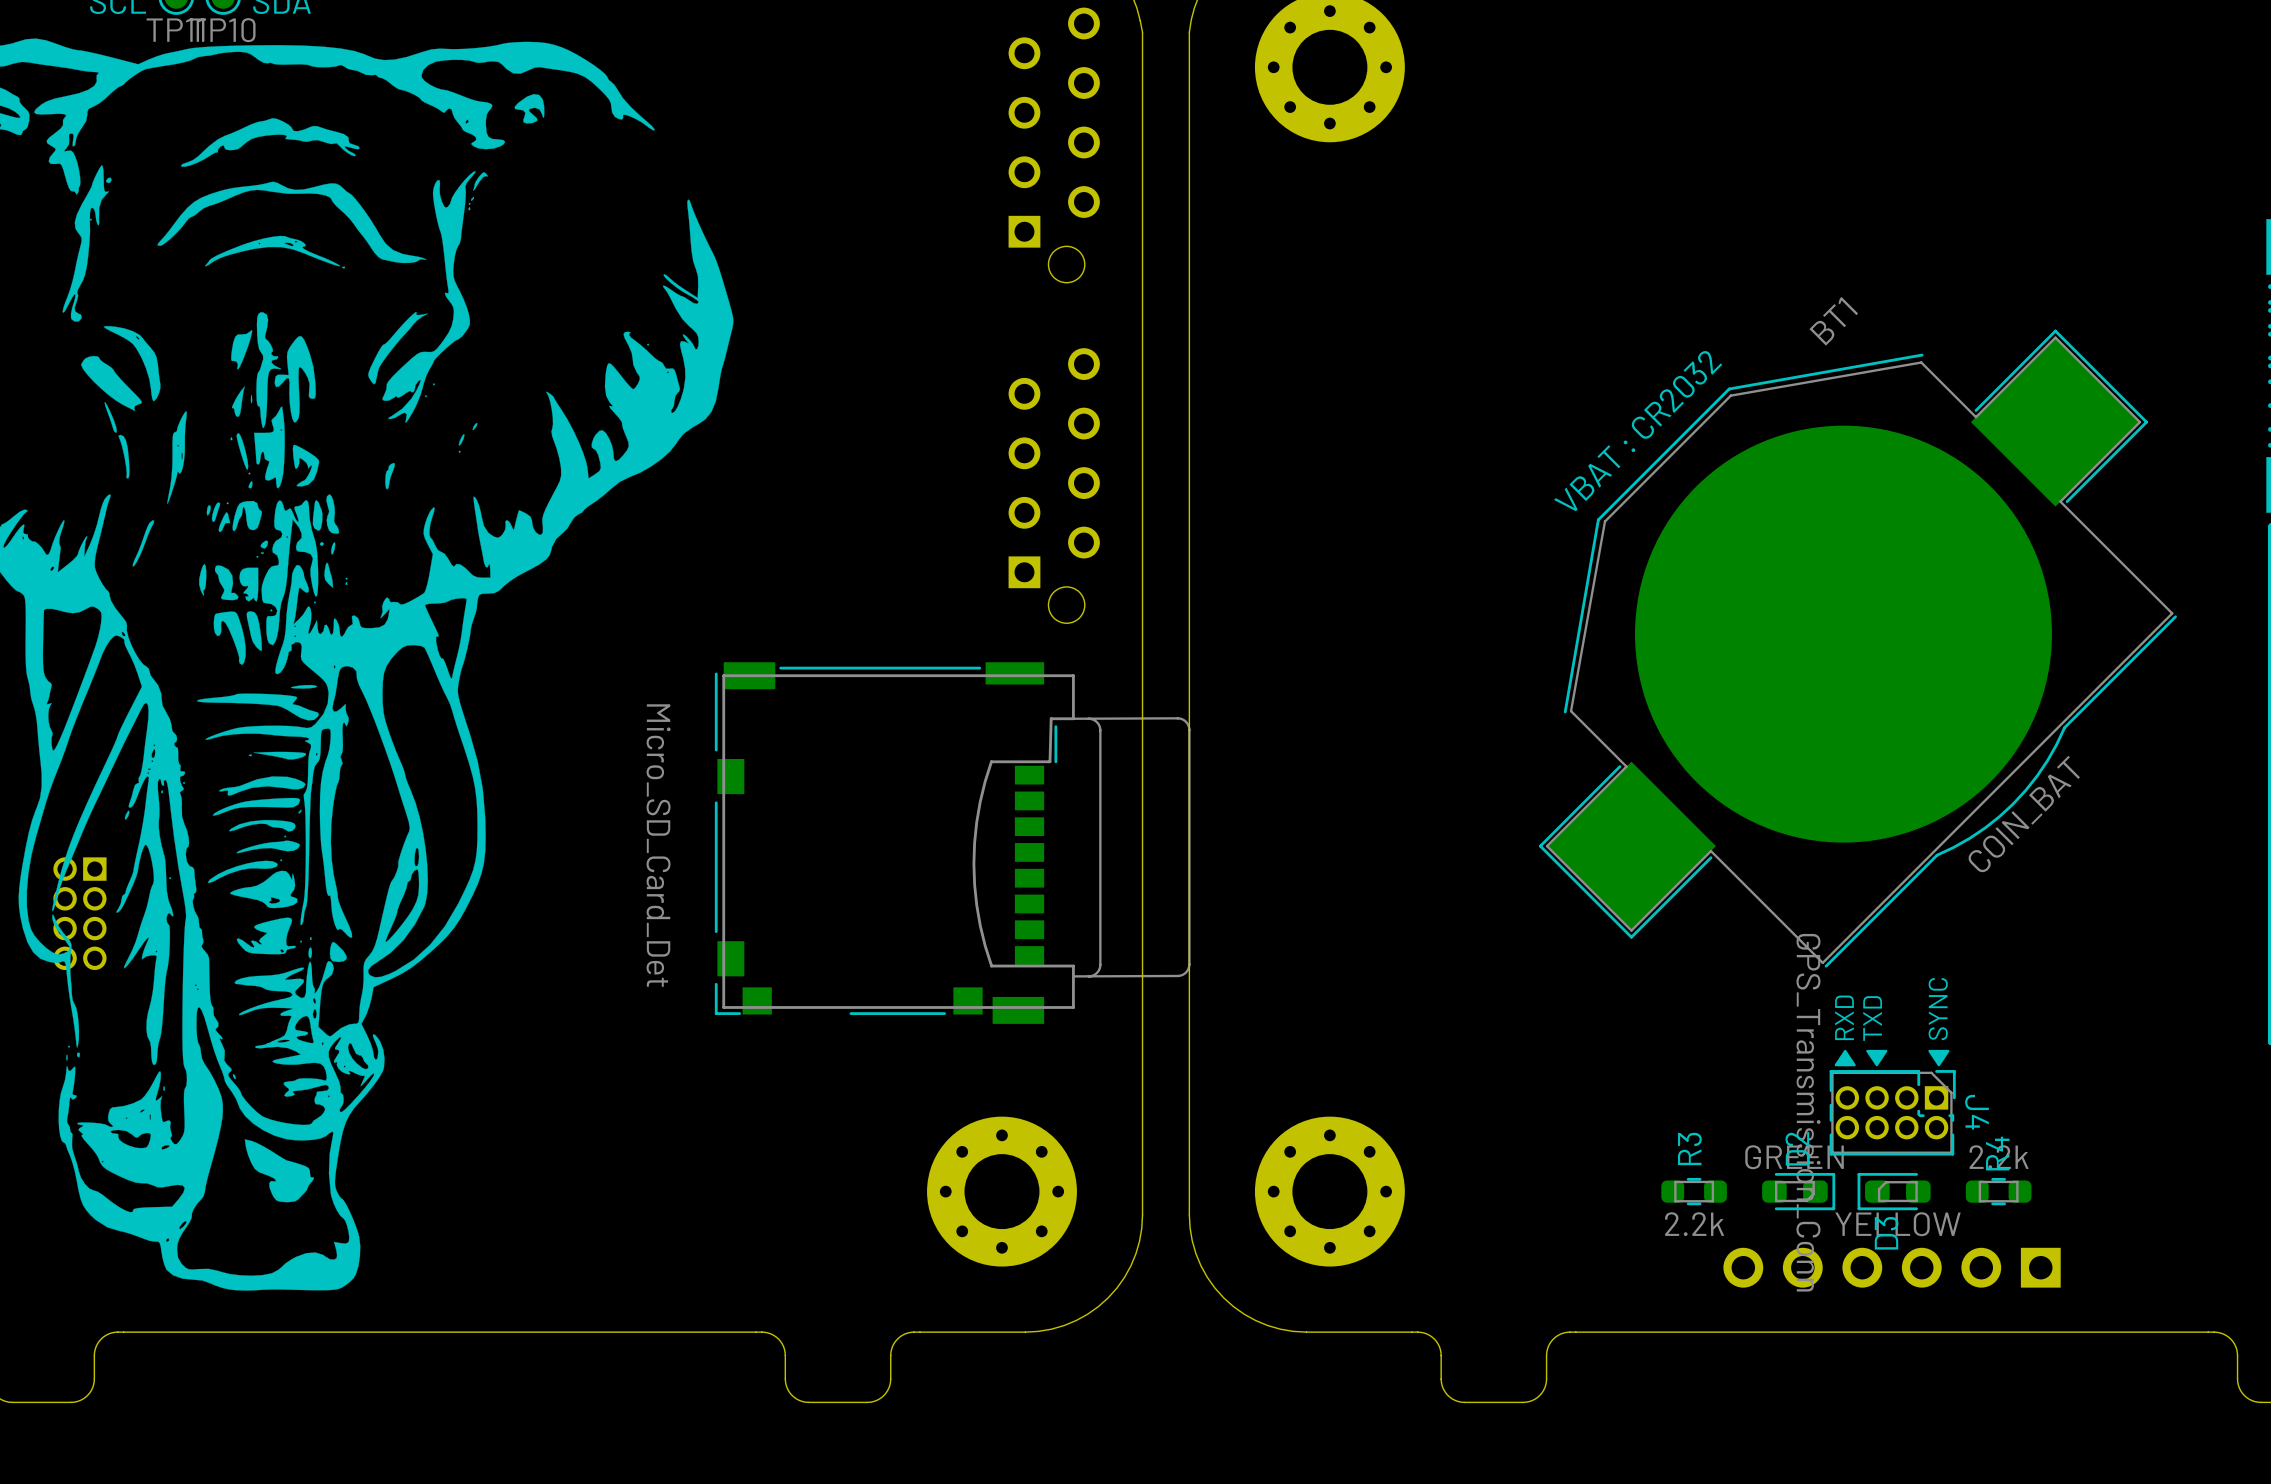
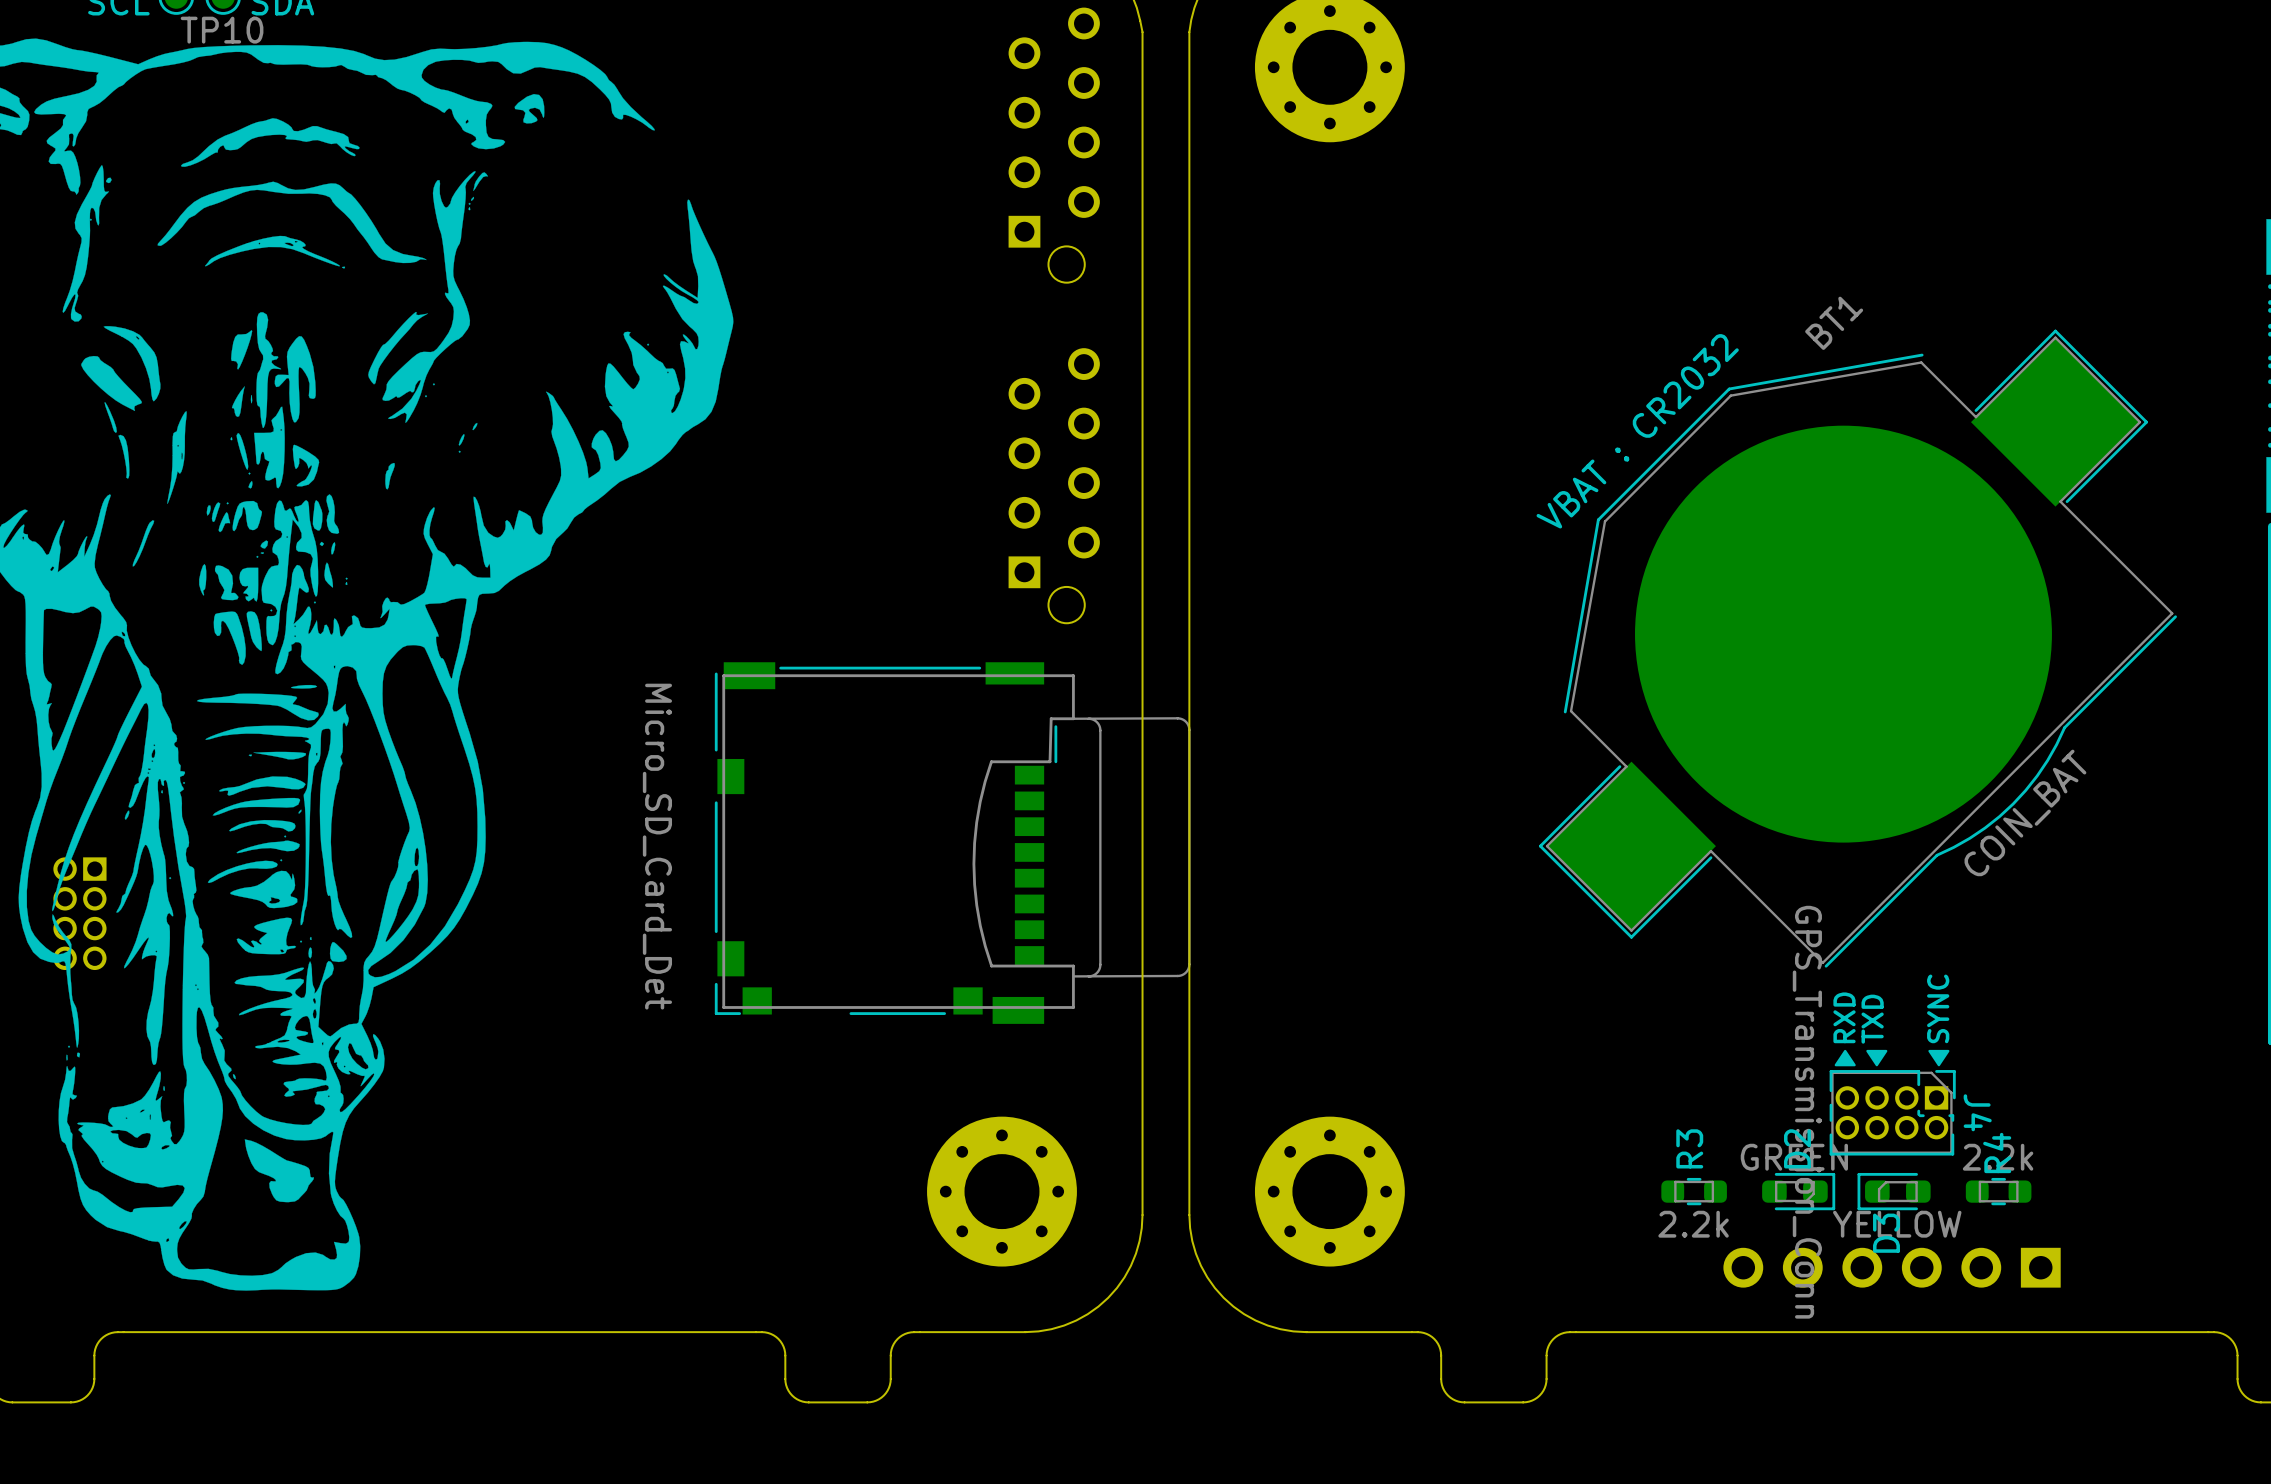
TP11 name: TP11 (175, 30) -> none

